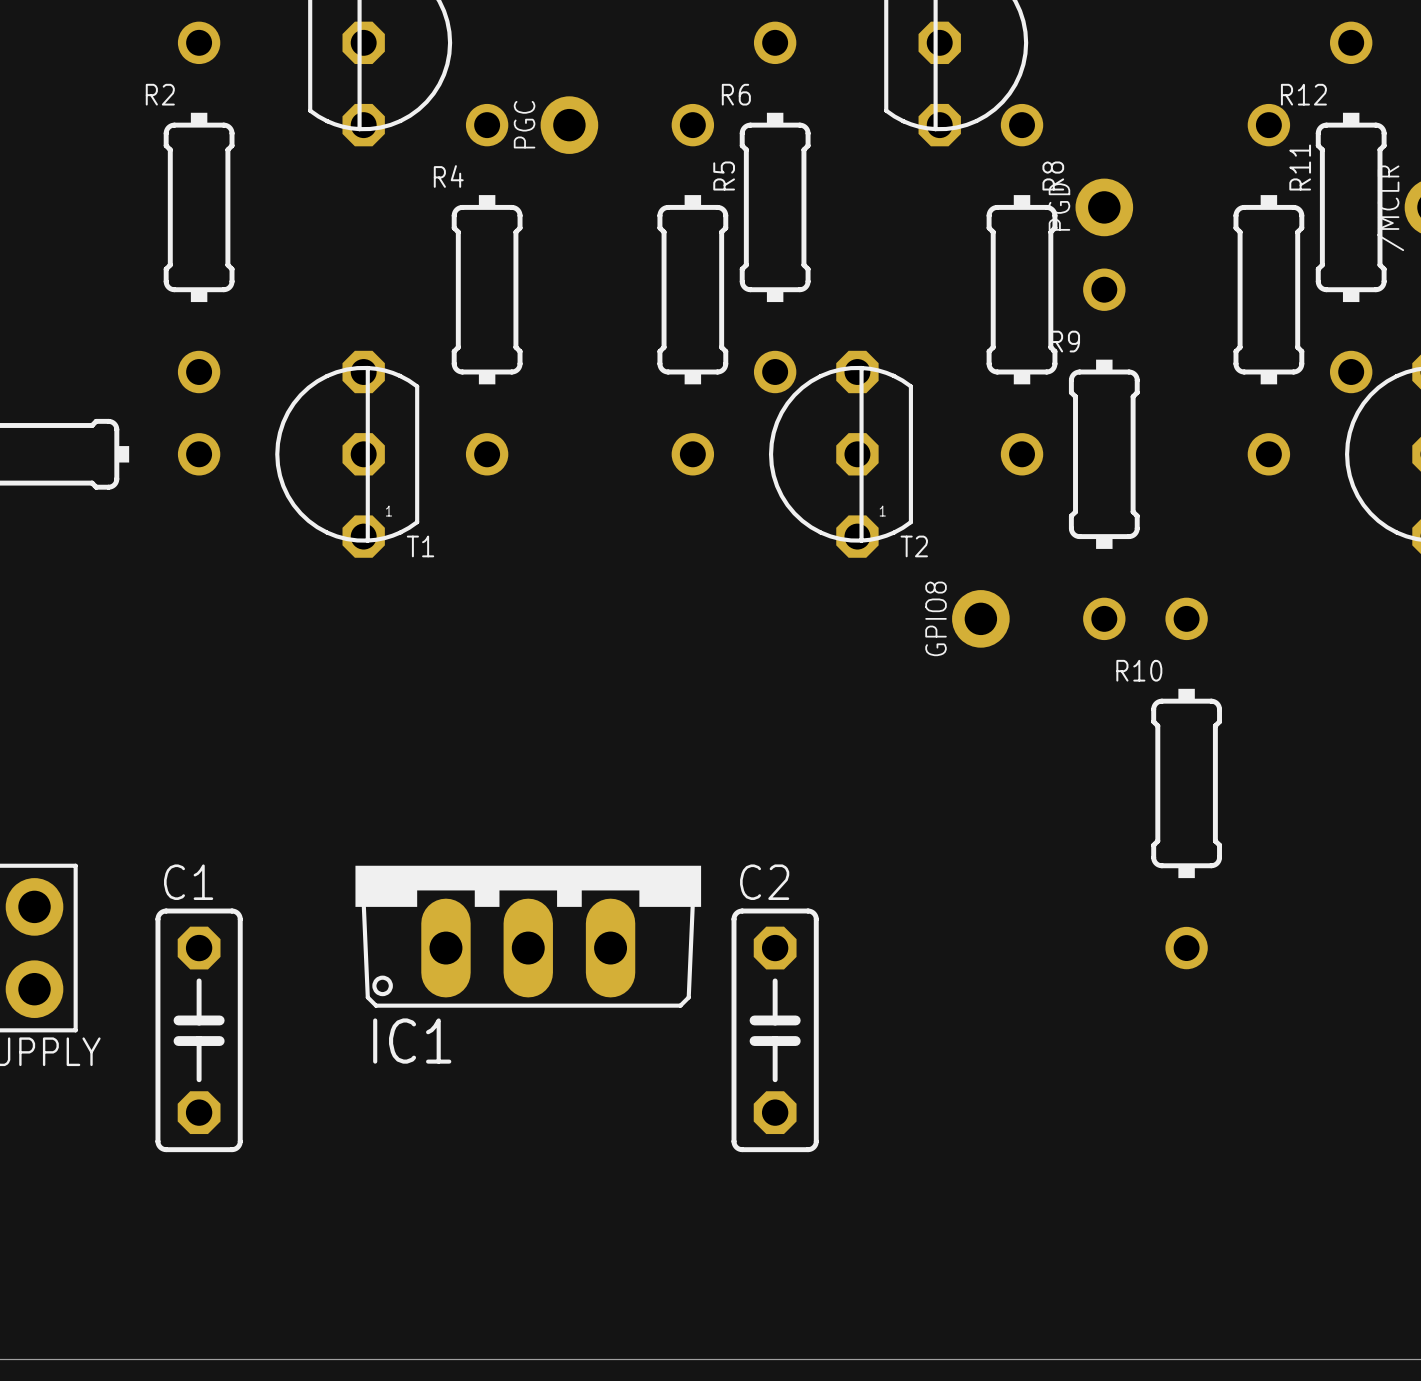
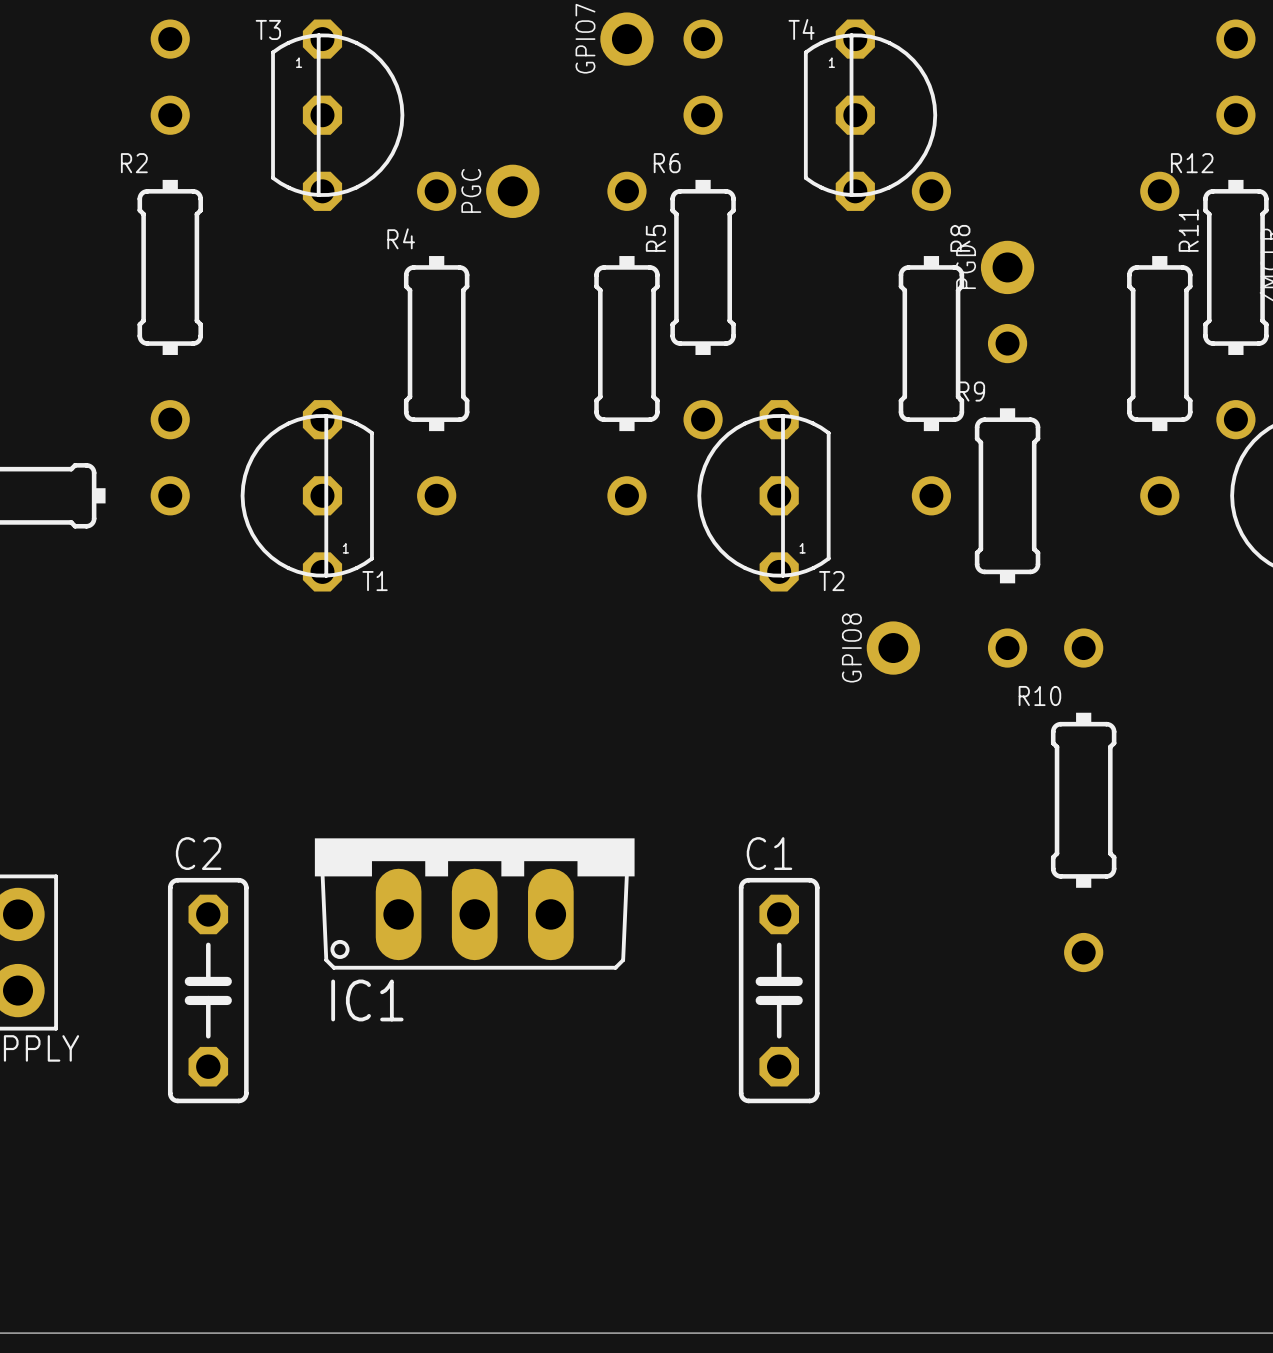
IC1 position: (528, 936) -> (474, 903)
C1 position: (199, 1030) -> (779, 990)
C2 position: (775, 1030) -> (208, 990)

